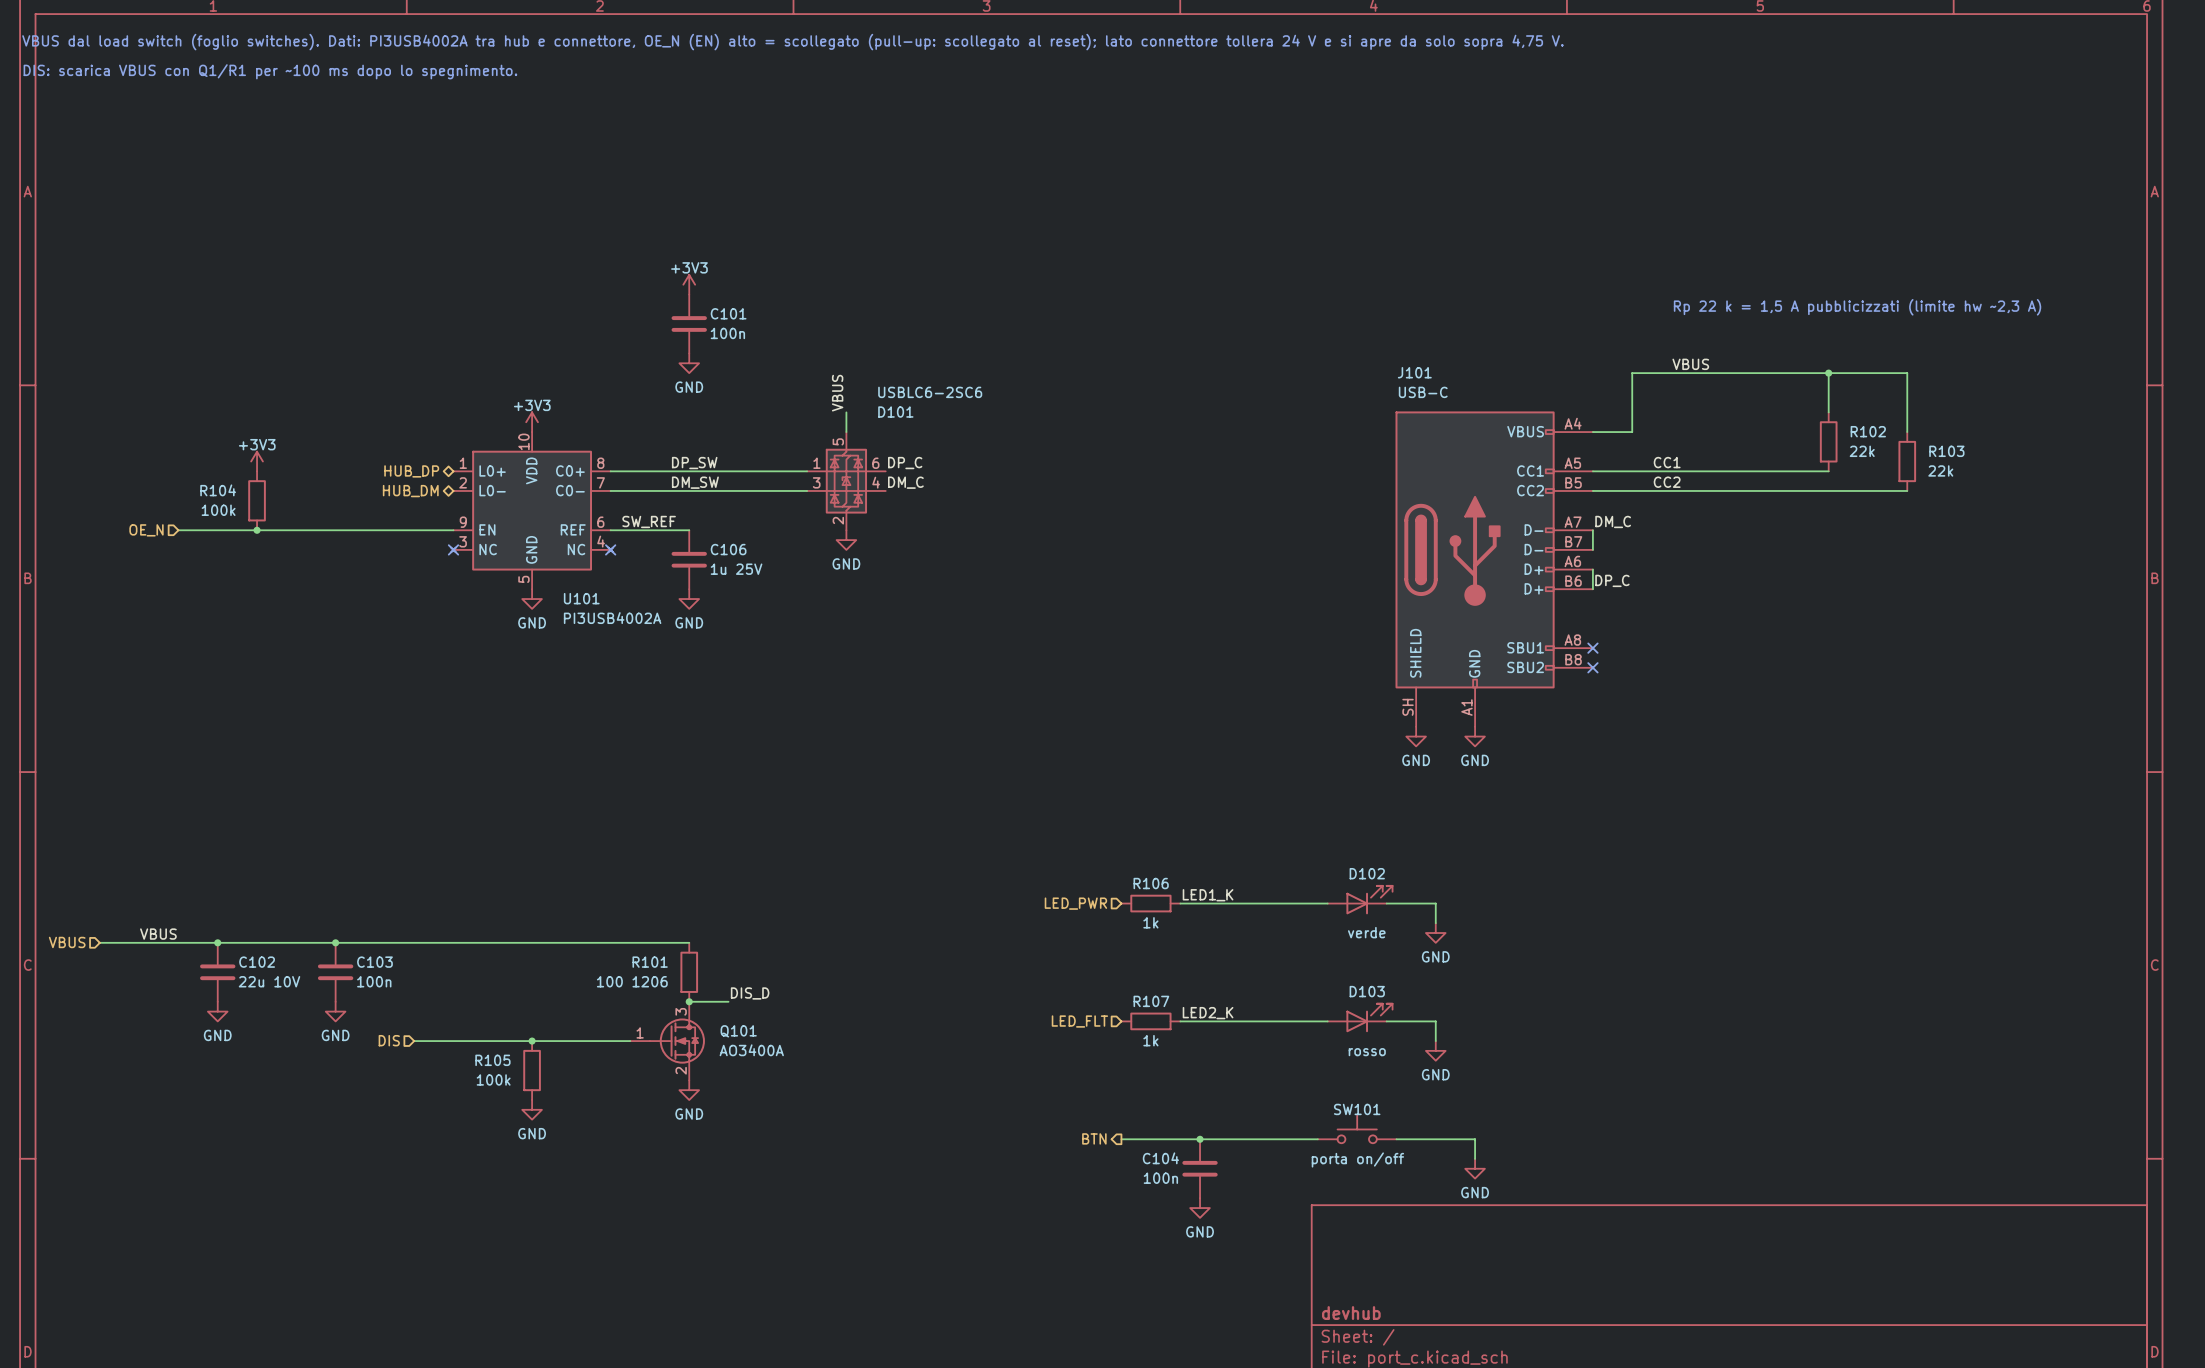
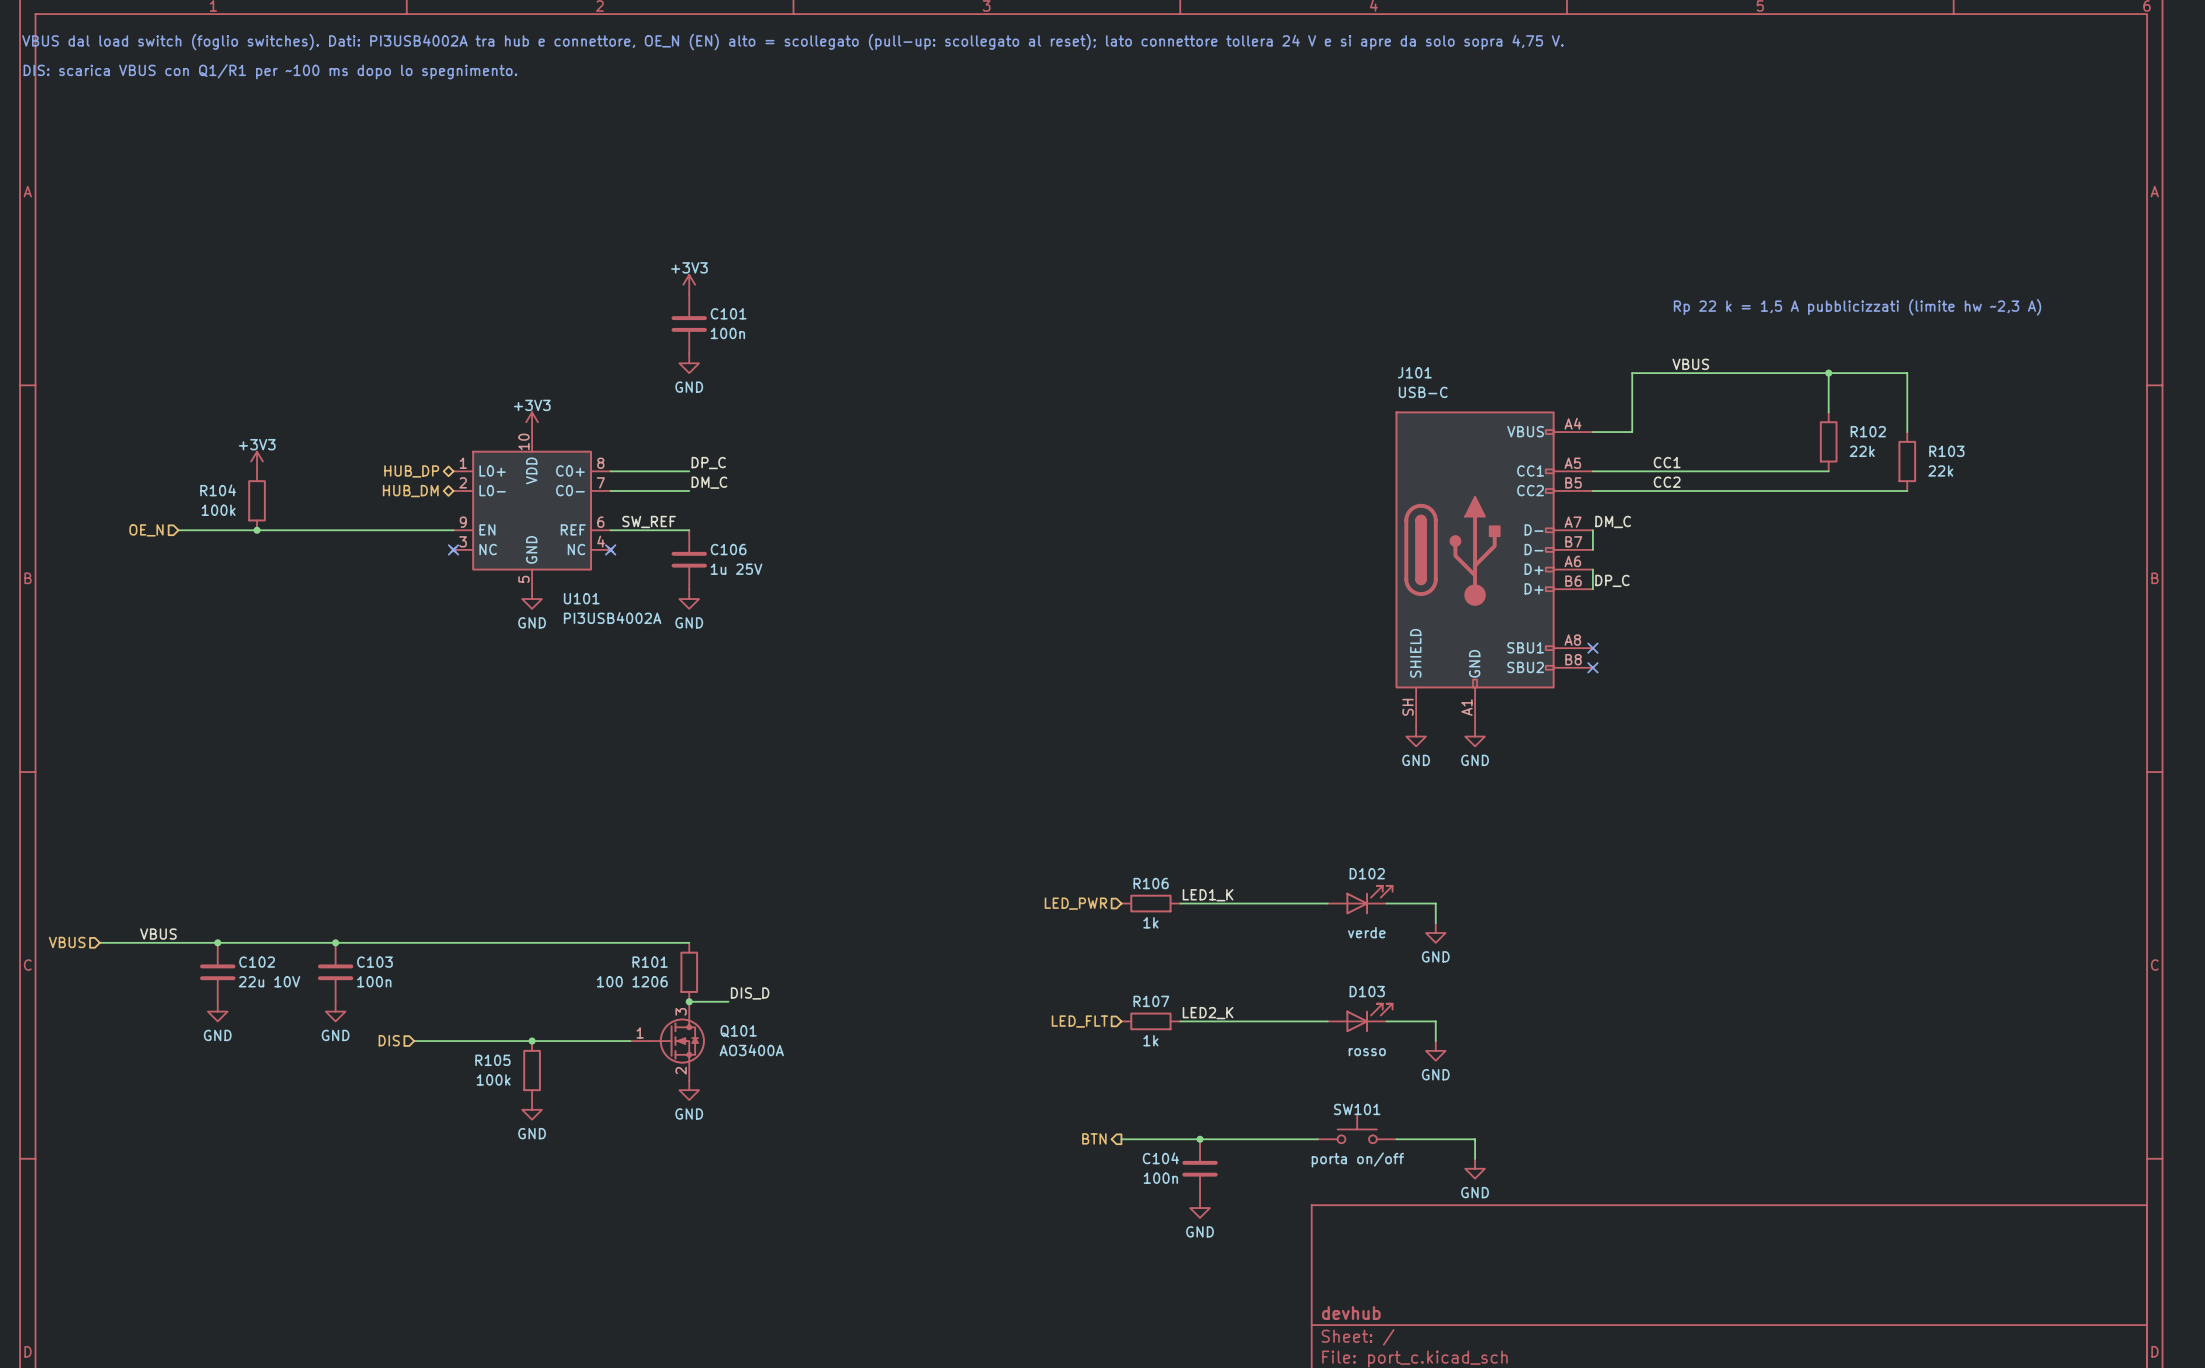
label: VBUS (837, 393) -> none
wire: (846, 412) (846, 432) -> none
label: DP_SW (694, 463) -> DP_C (708, 463)
label: DP_C (905, 463) -> none
wire: (689, 471) (807, 471) -> none
D101: USBLC6-2SC6 (846, 481) -> none
label: DM_SW (695, 482) -> DM_C (709, 482)
label: DM_C (905, 482) -> none
wire: (689, 490) (807, 490) -> none
power symbol: GND (846, 540) -> none

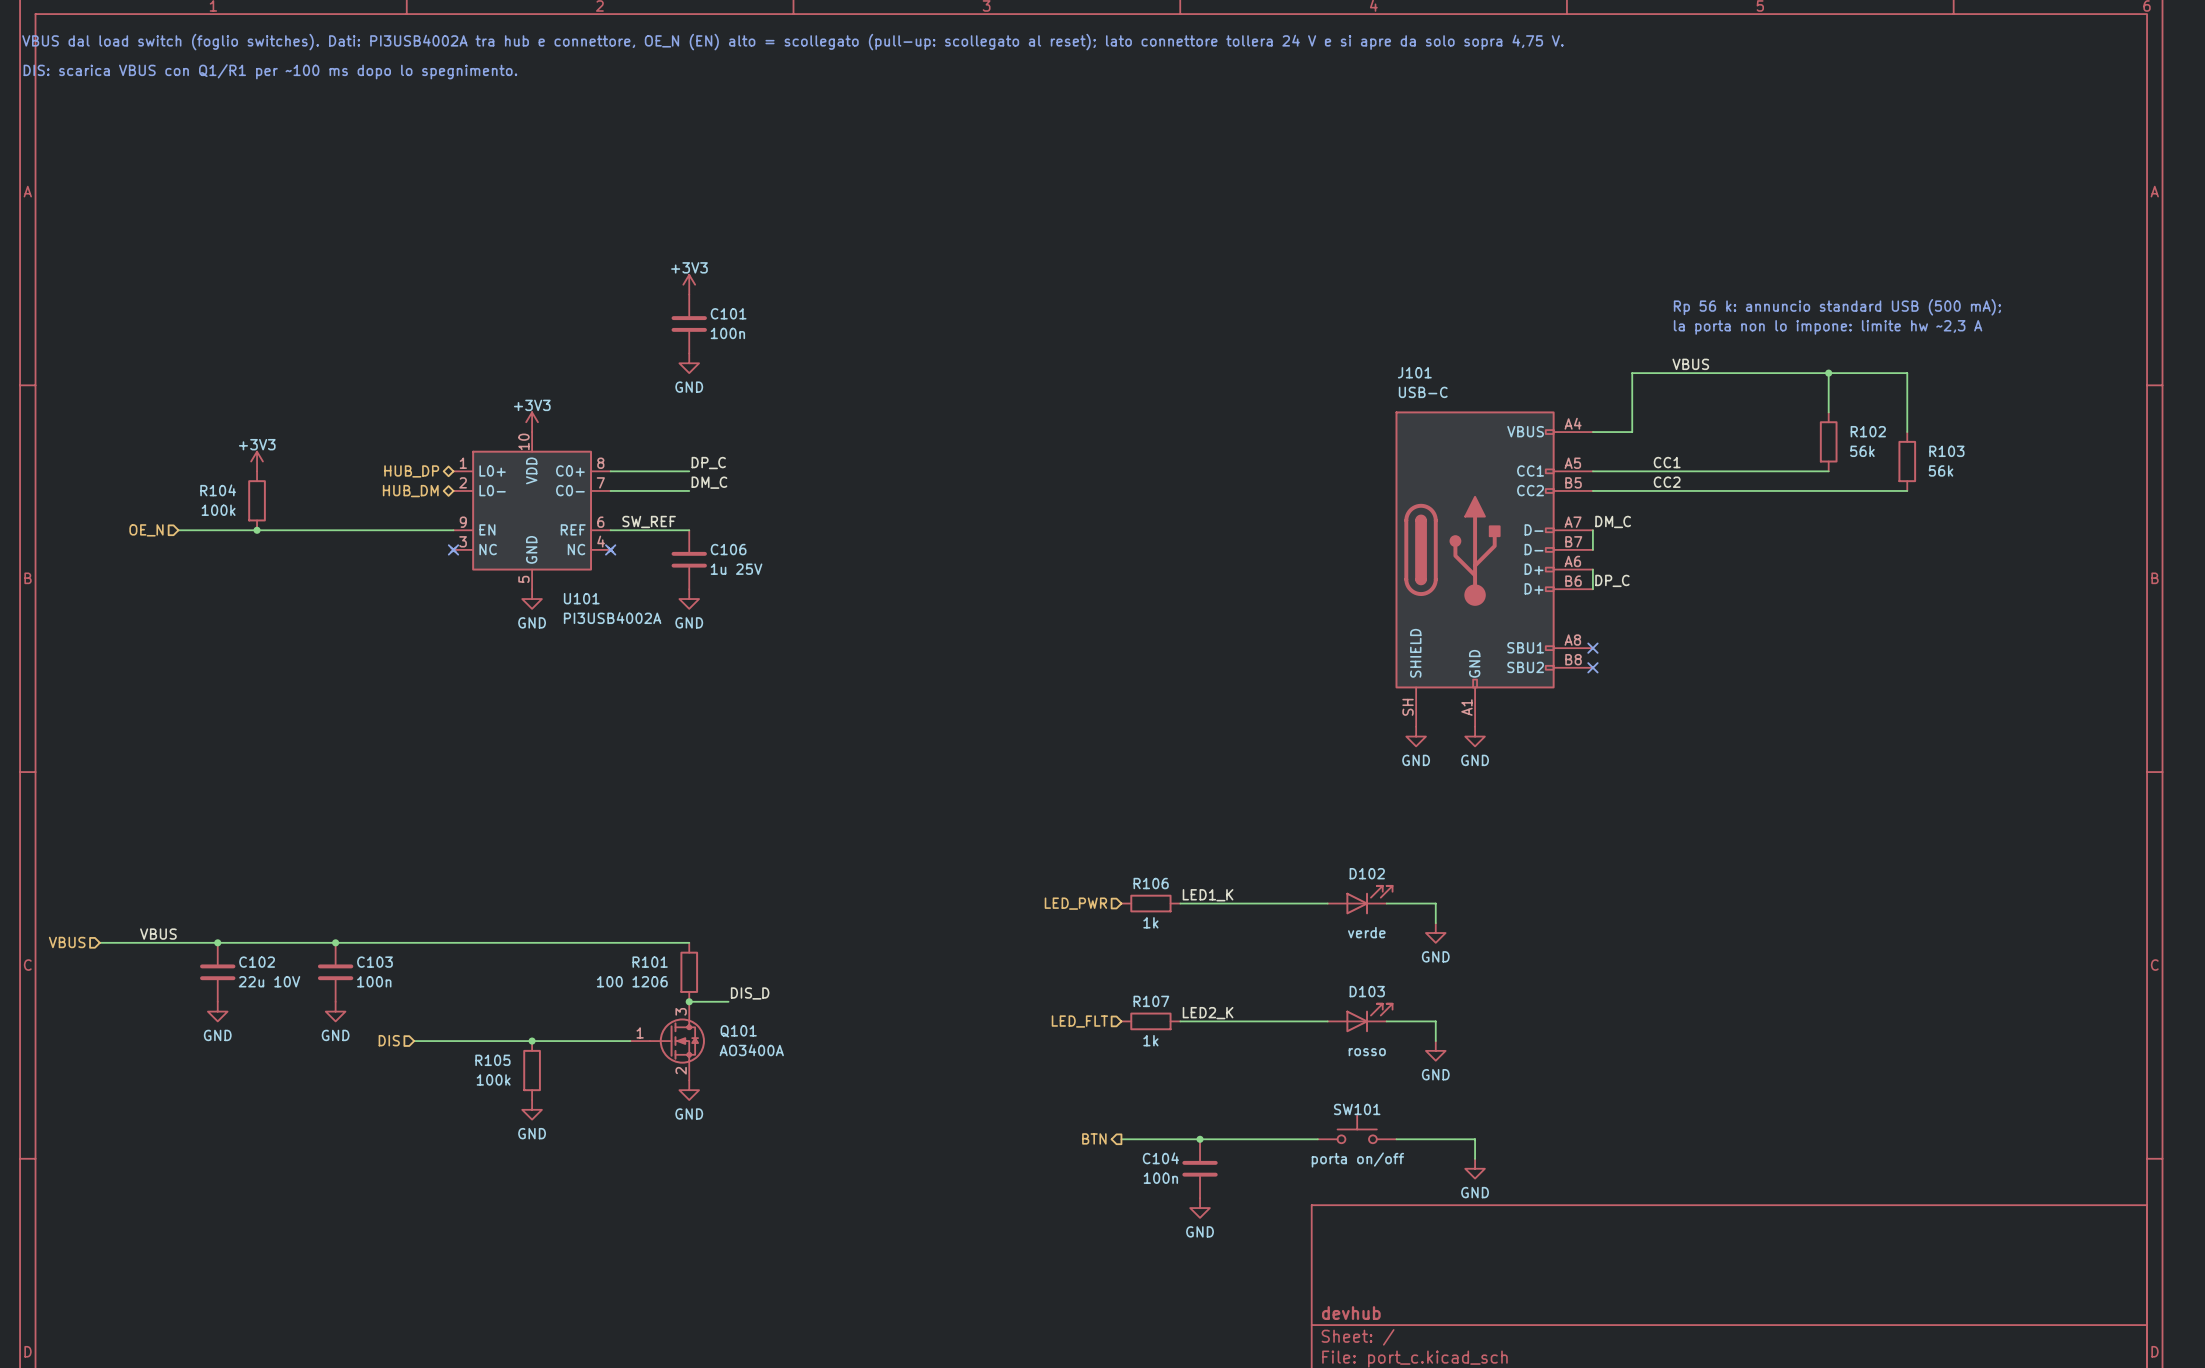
text: Rp 22 k = 1,5 A pubblicizzati (limite hw ~2,3 A) (1857, 307) -> Rp 56 k: annuncio standard USB (500 mA); (1837, 307)
text: none -> la porta non lo impone: limite hw ~2,3 A (1828, 327)
R102 value: 22k (1862, 451) -> 56k (1862, 451)
R103 value: 22k (1940, 470) -> 56k (1941, 470)

